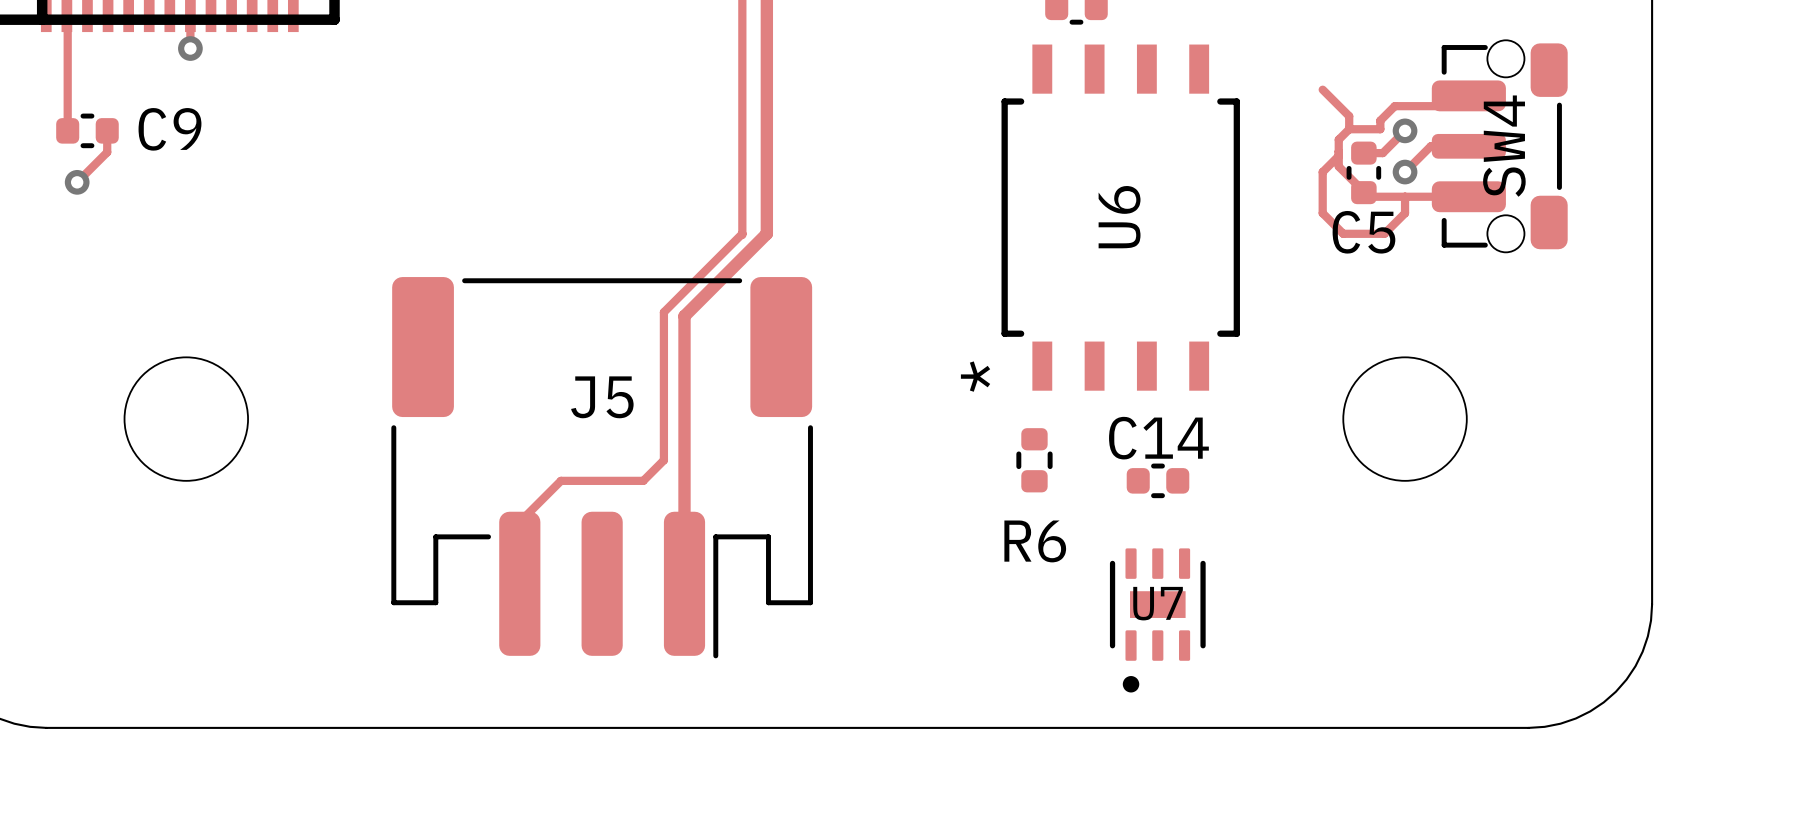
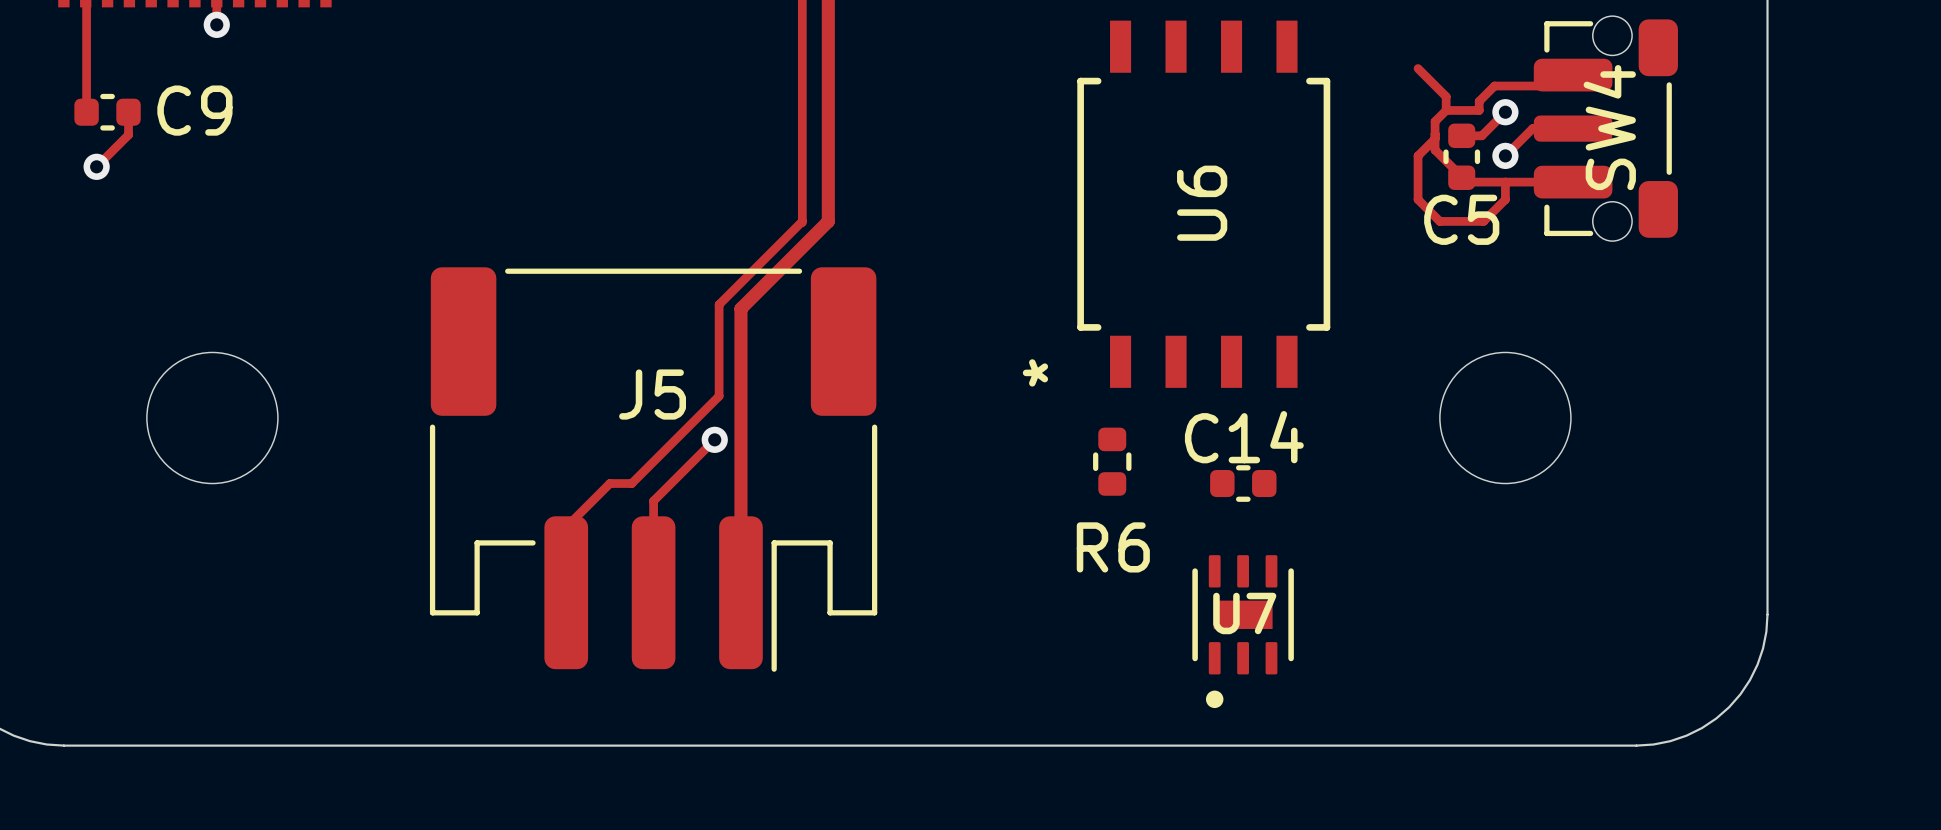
track: (663, 398) (663, 460) (643, 480) (581, 480) -> (719, 396) (631, 483)
track: none -> (714, 439) (653, 500) (653, 592)
via: none -> (714, 439)

